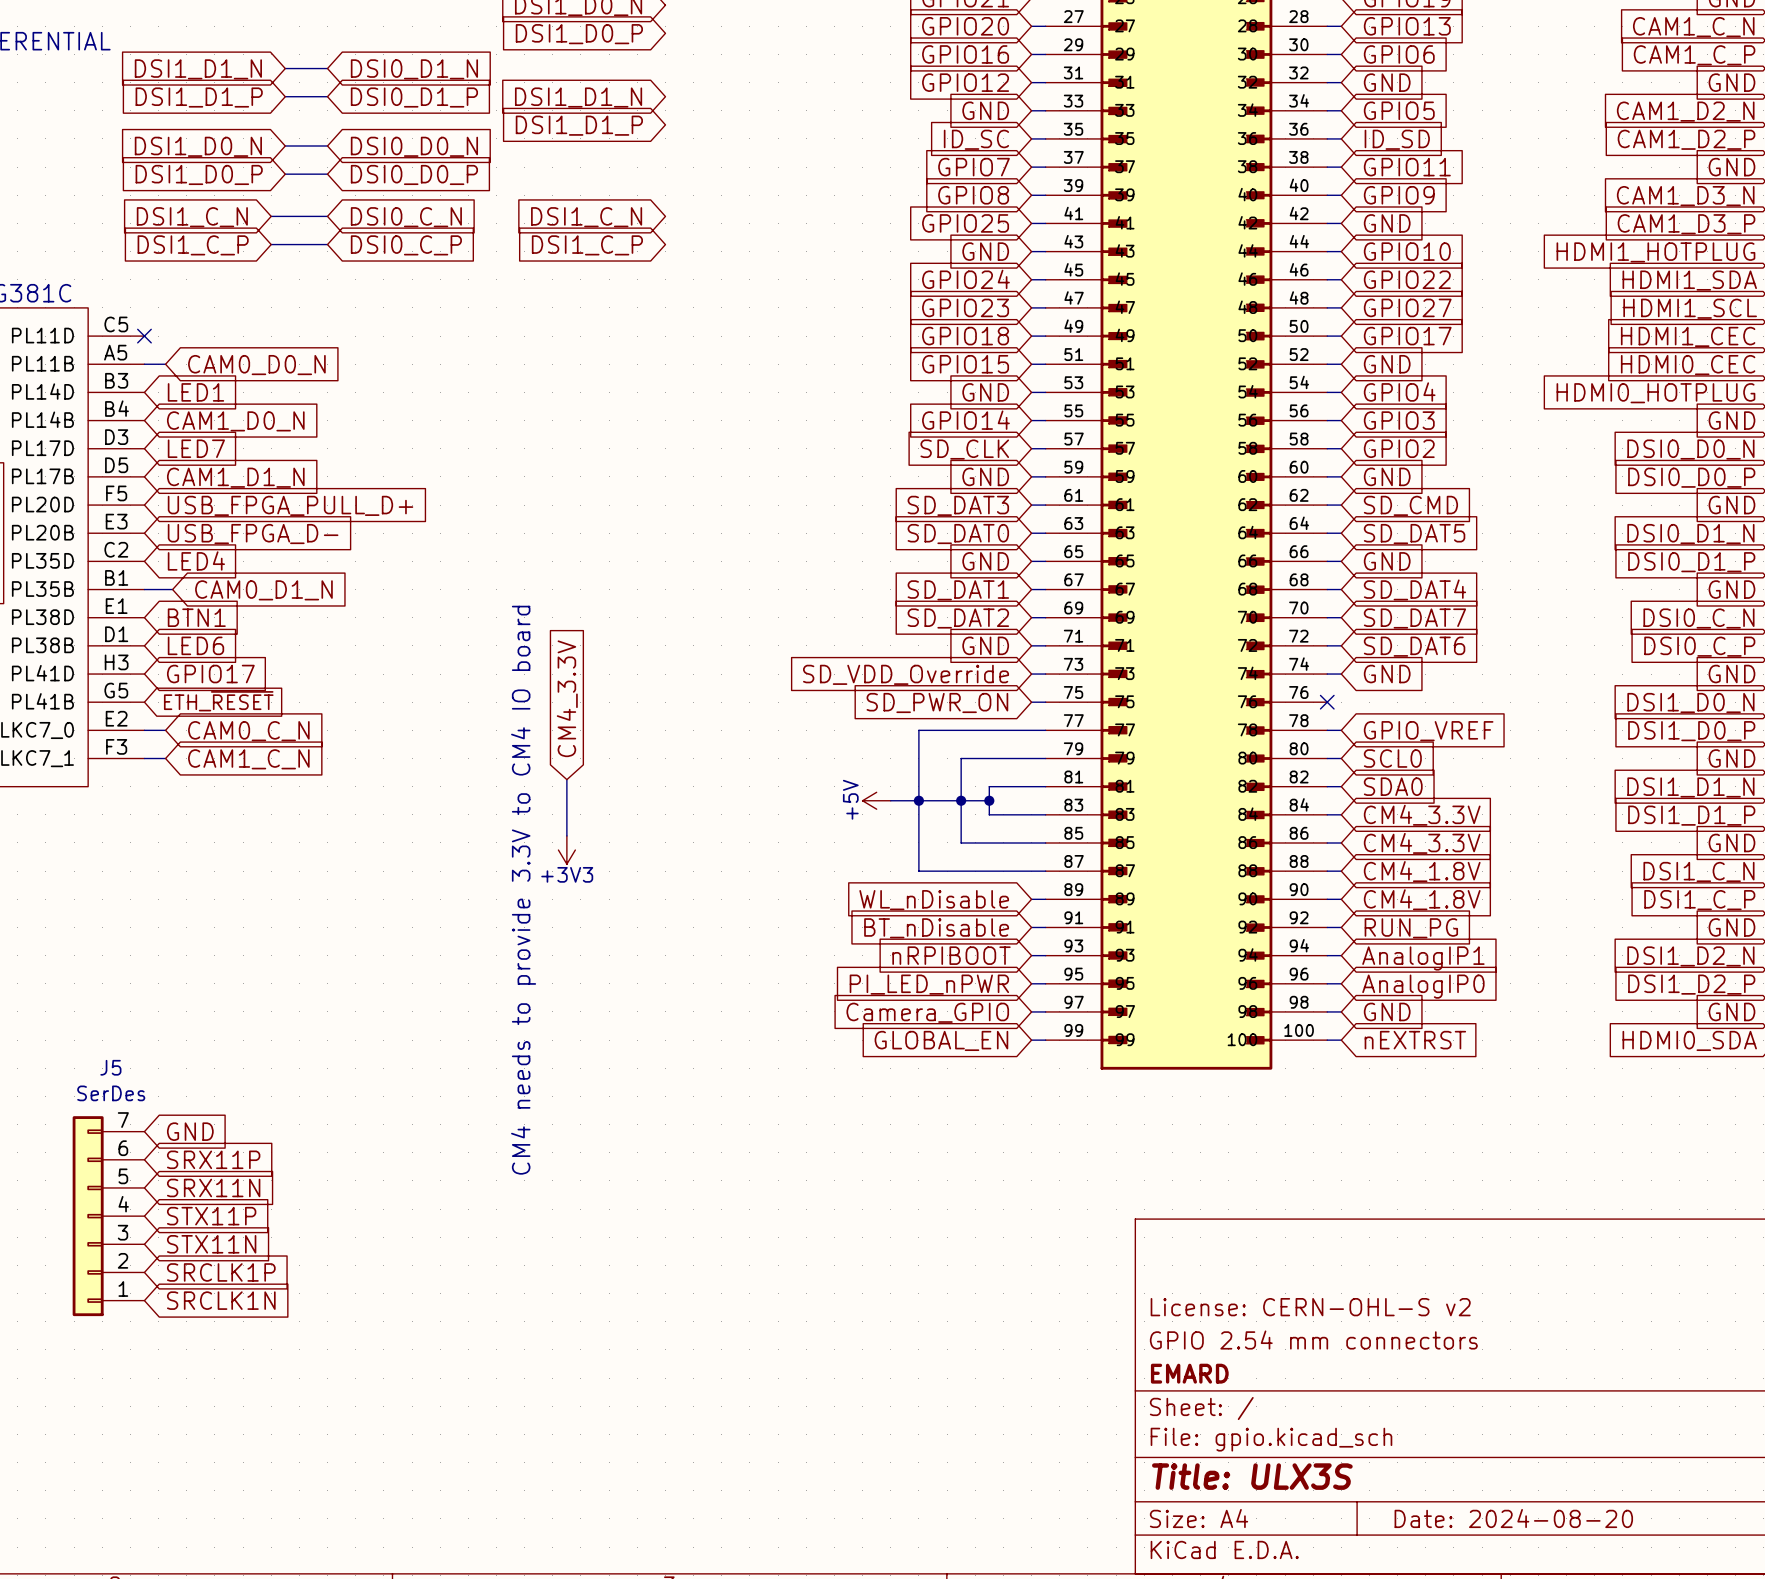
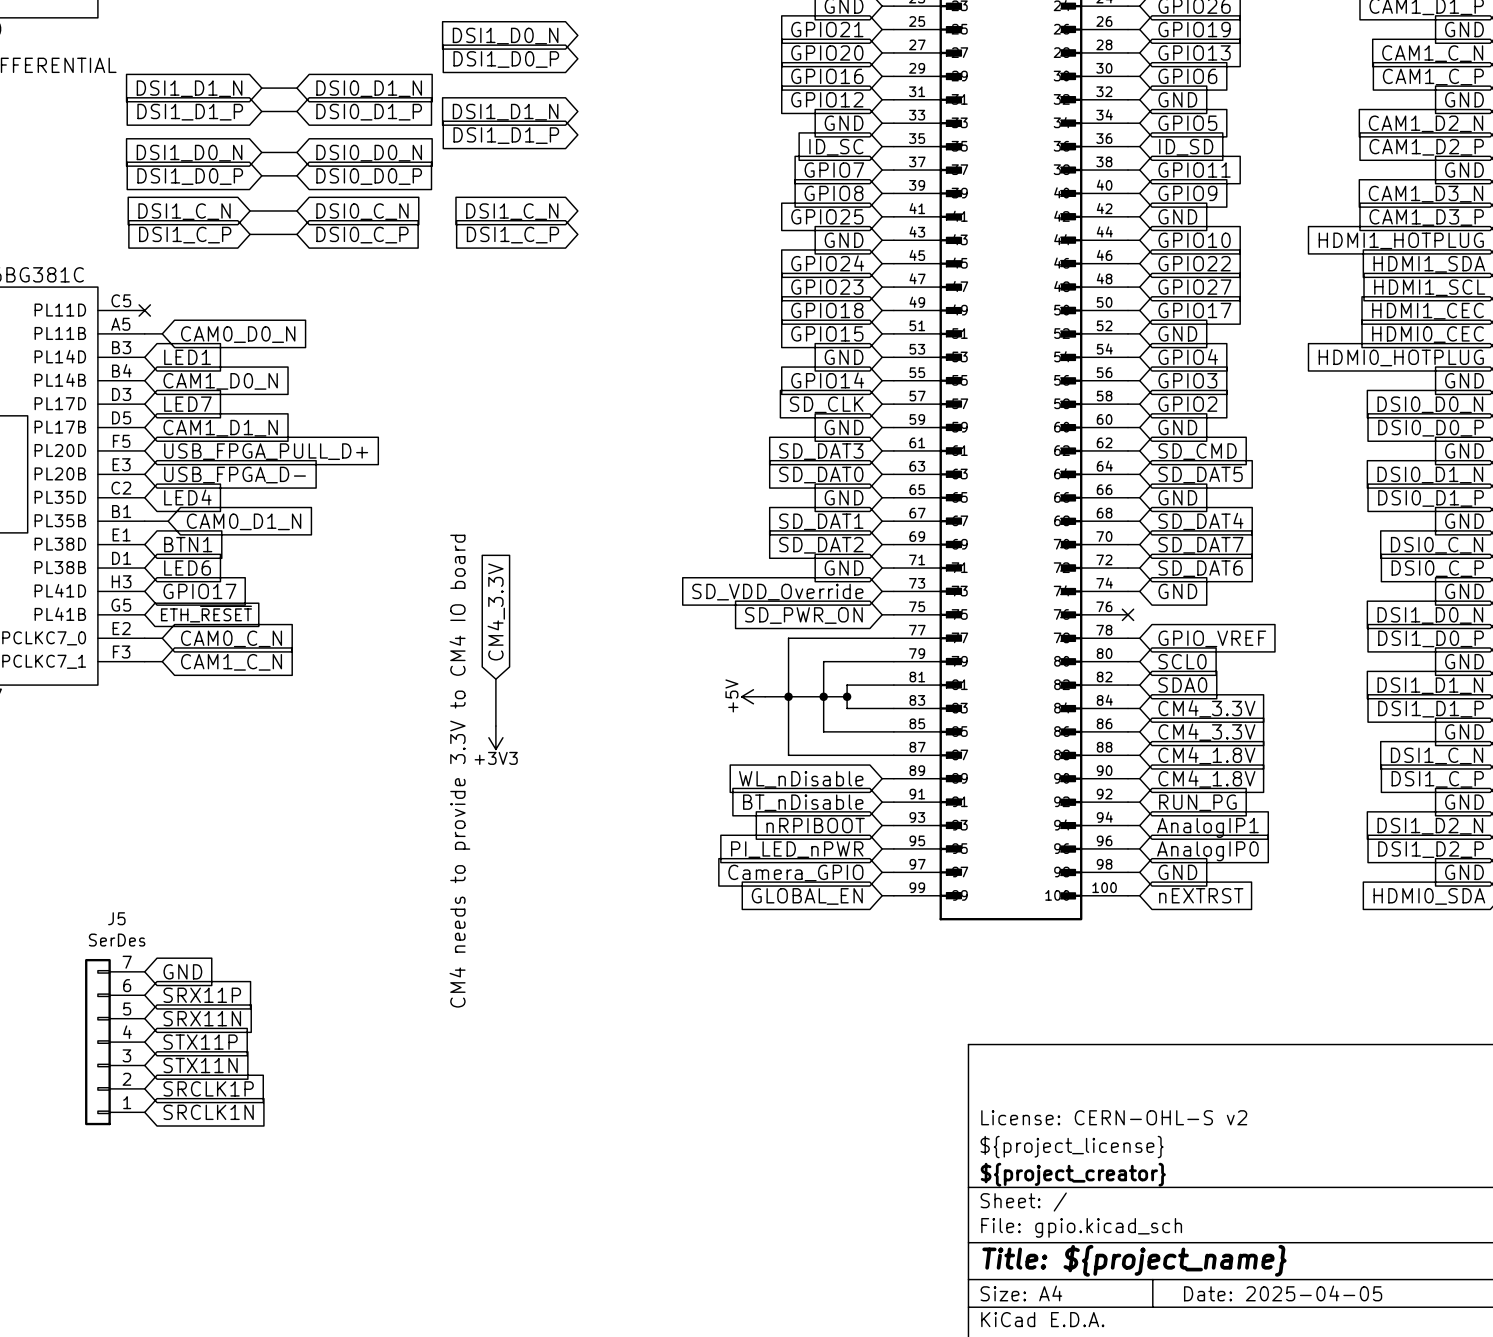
title block: GPIO 2.54 mm connectors (1313, 1340) -> ${project_license} (1072, 1147)
title block: EMARD (1189, 1373) -> ${project_creator} (1073, 1174)
title block: Title: ULX3S (1252, 1476) -> Title: ${project_name} (1134, 1260)
title block: Date: 2024-08-20 (1513, 1518) -> Date: 2025-04-05 (1283, 1293)

